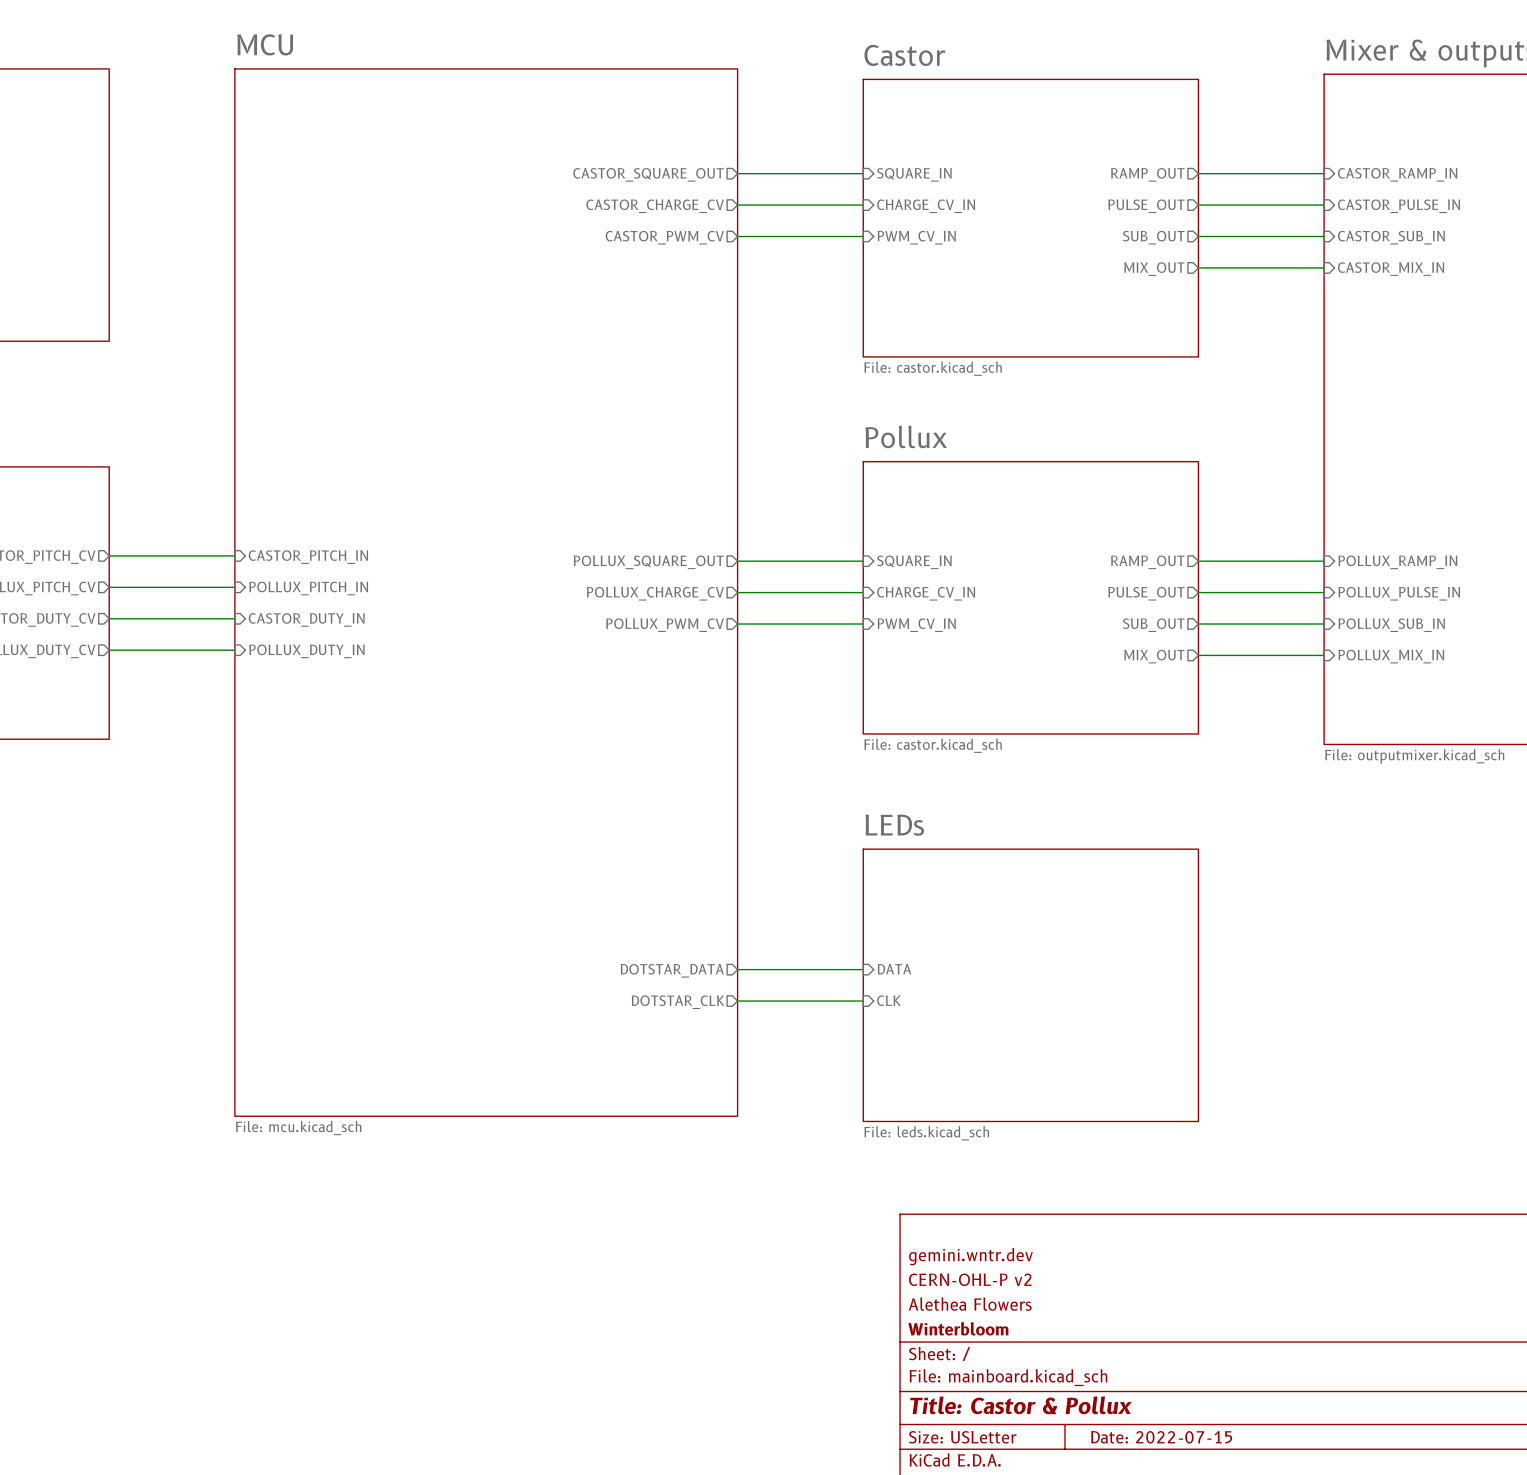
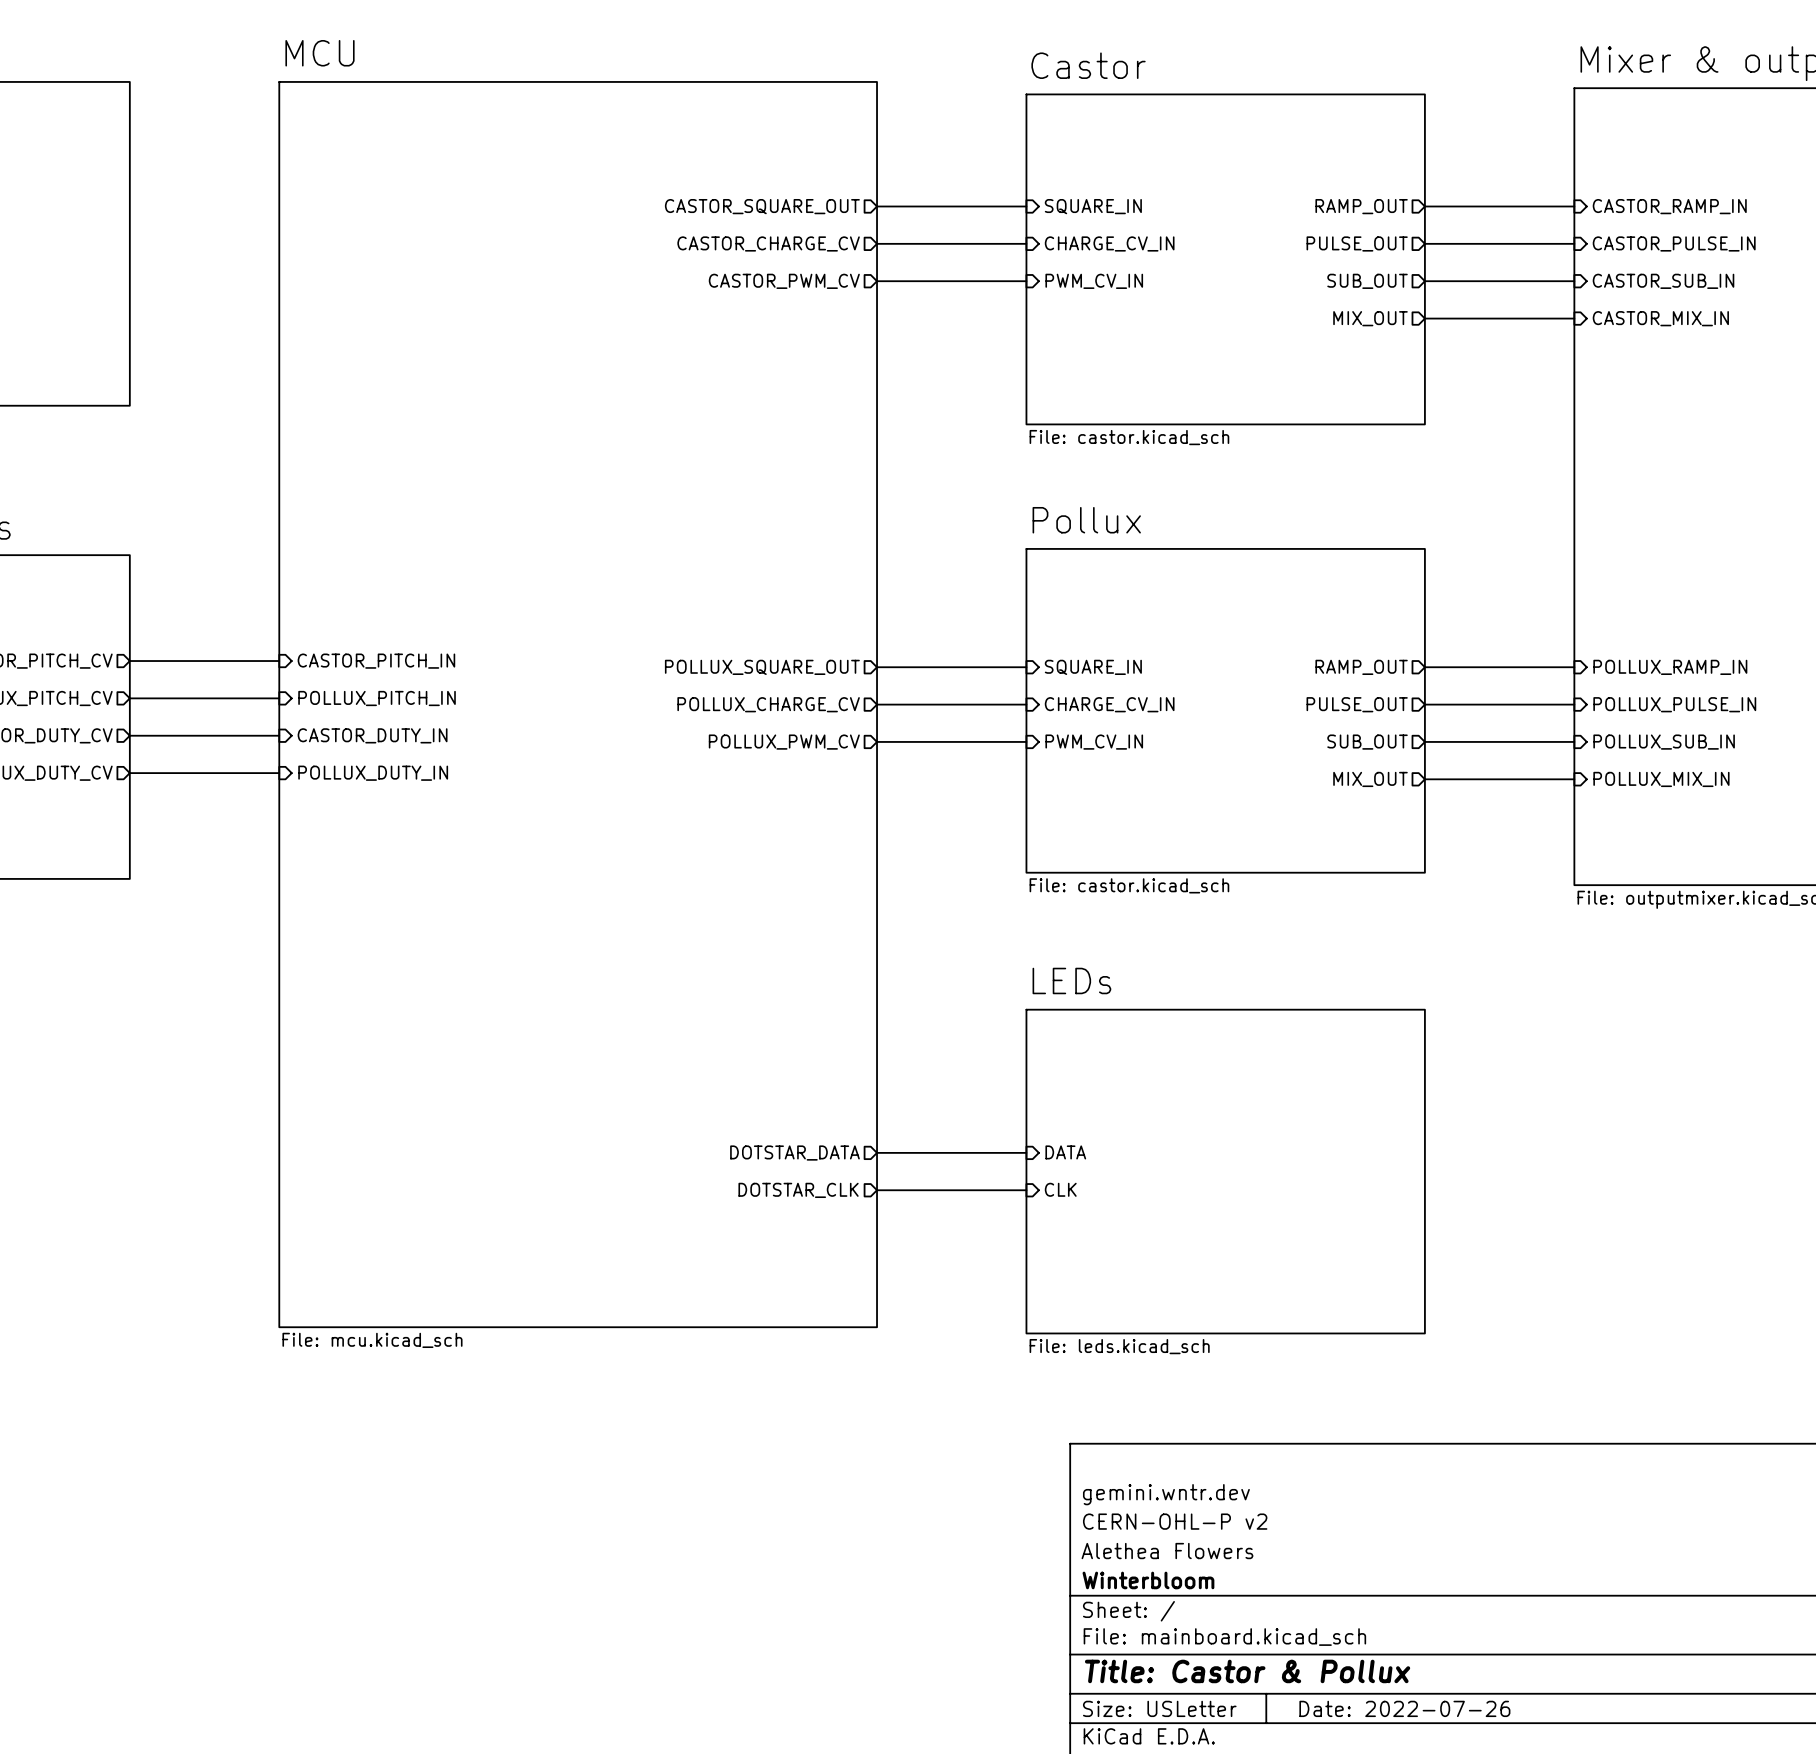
title block: Date: 2022-07-15 (1161, 1437) -> Date: 2022-07-26 (1404, 1708)

